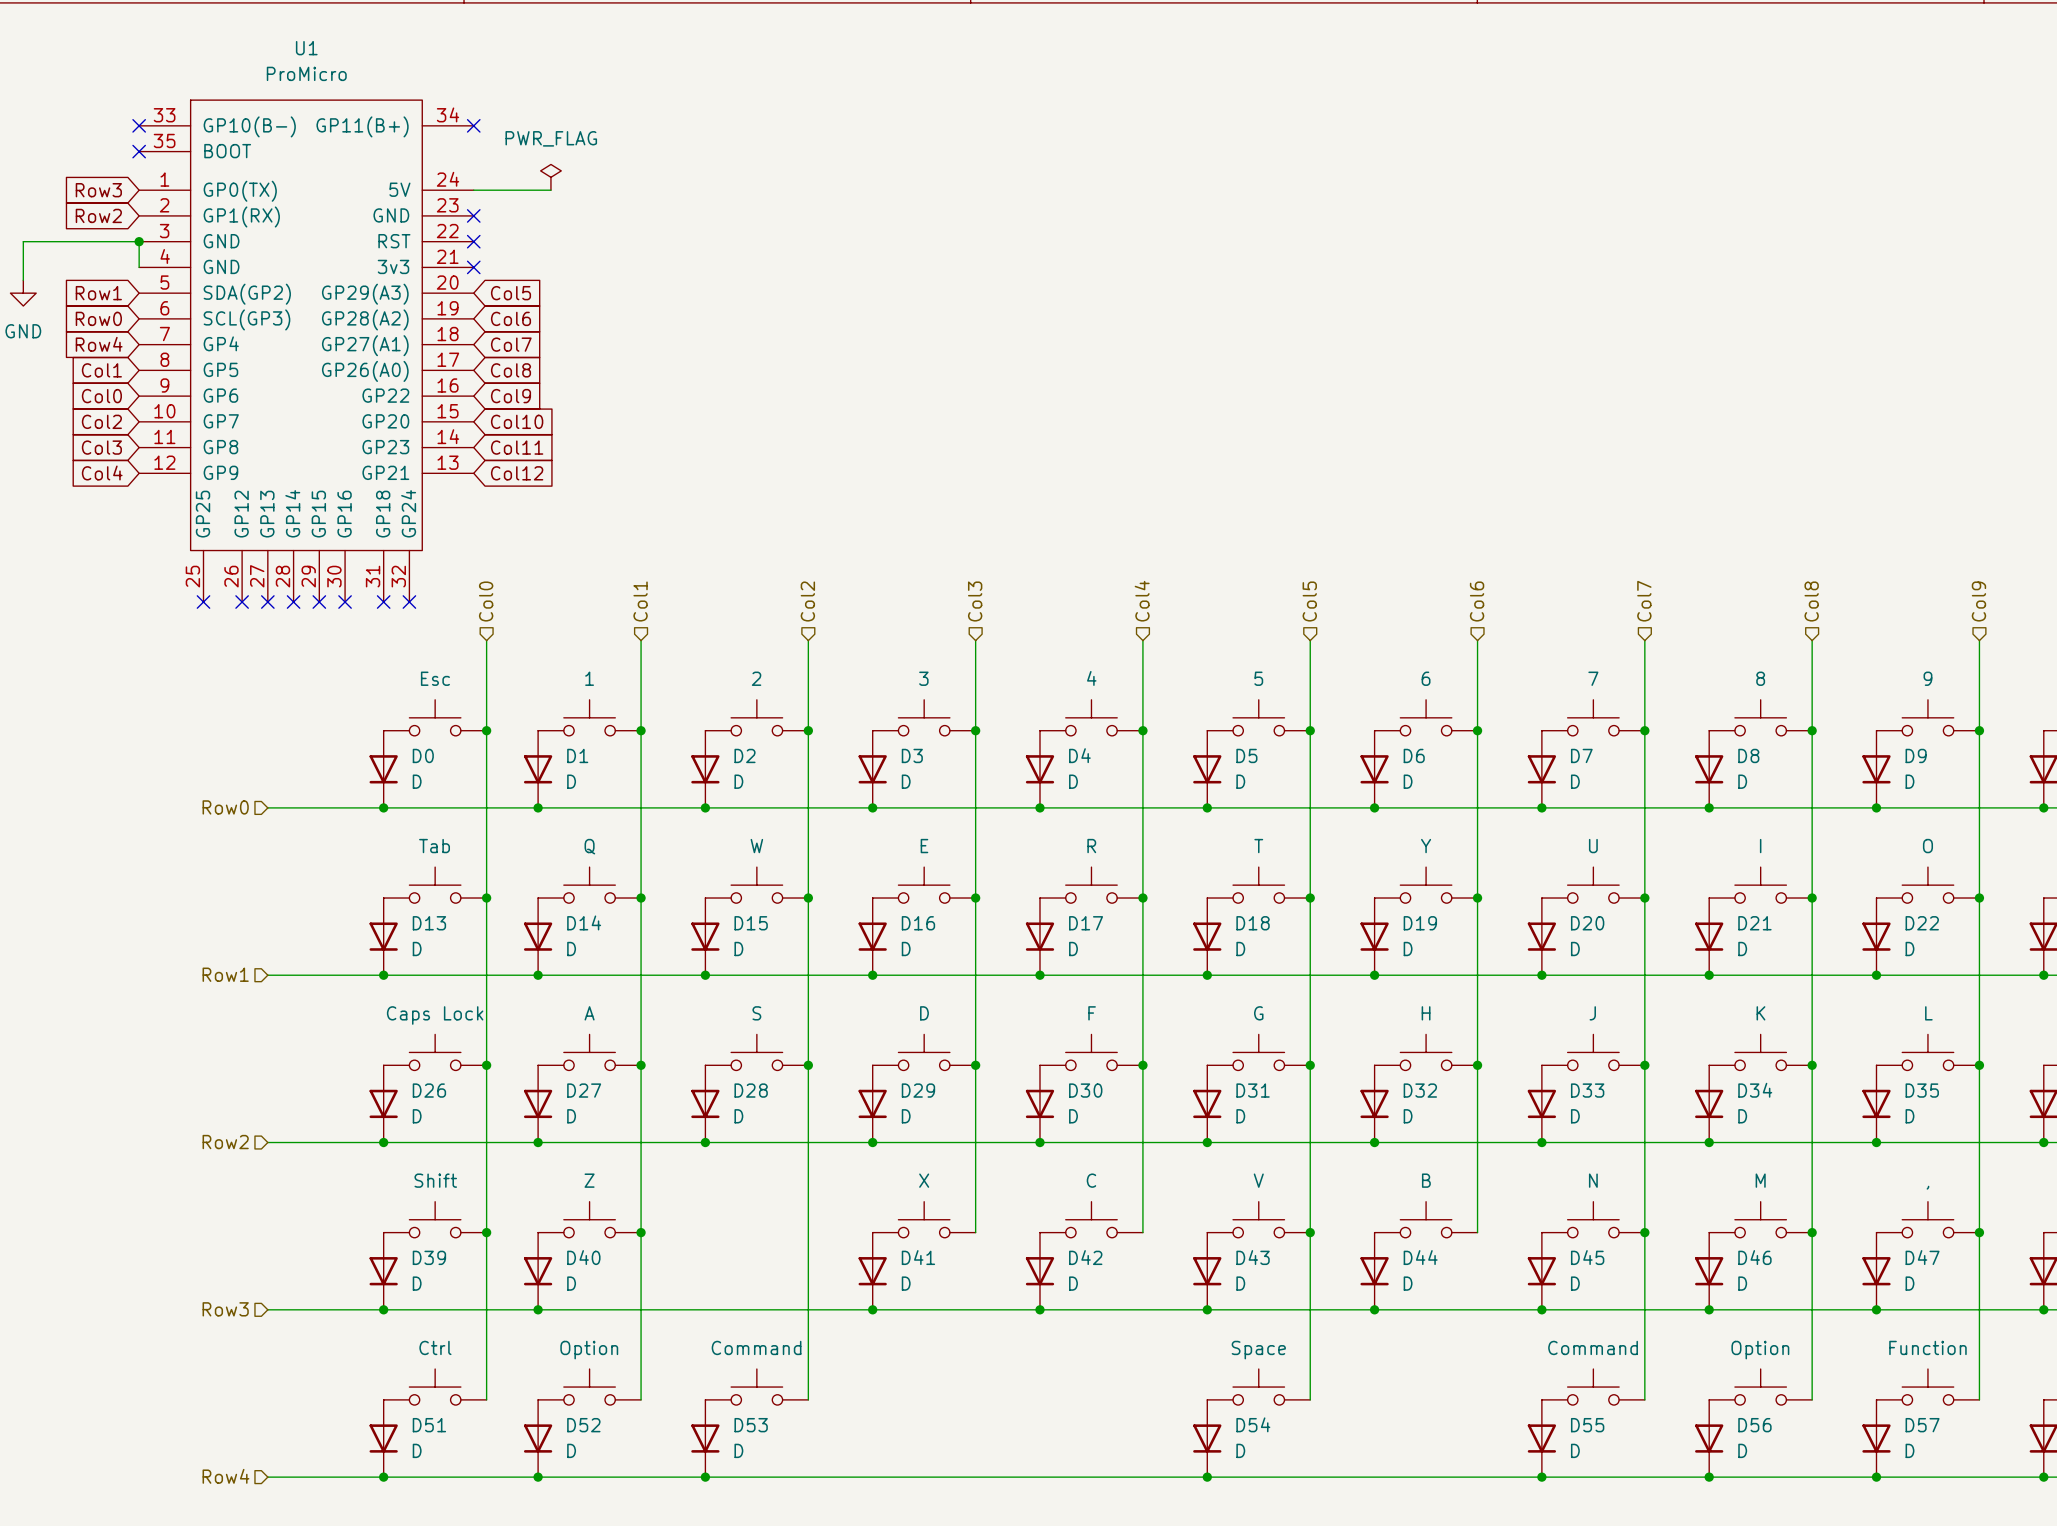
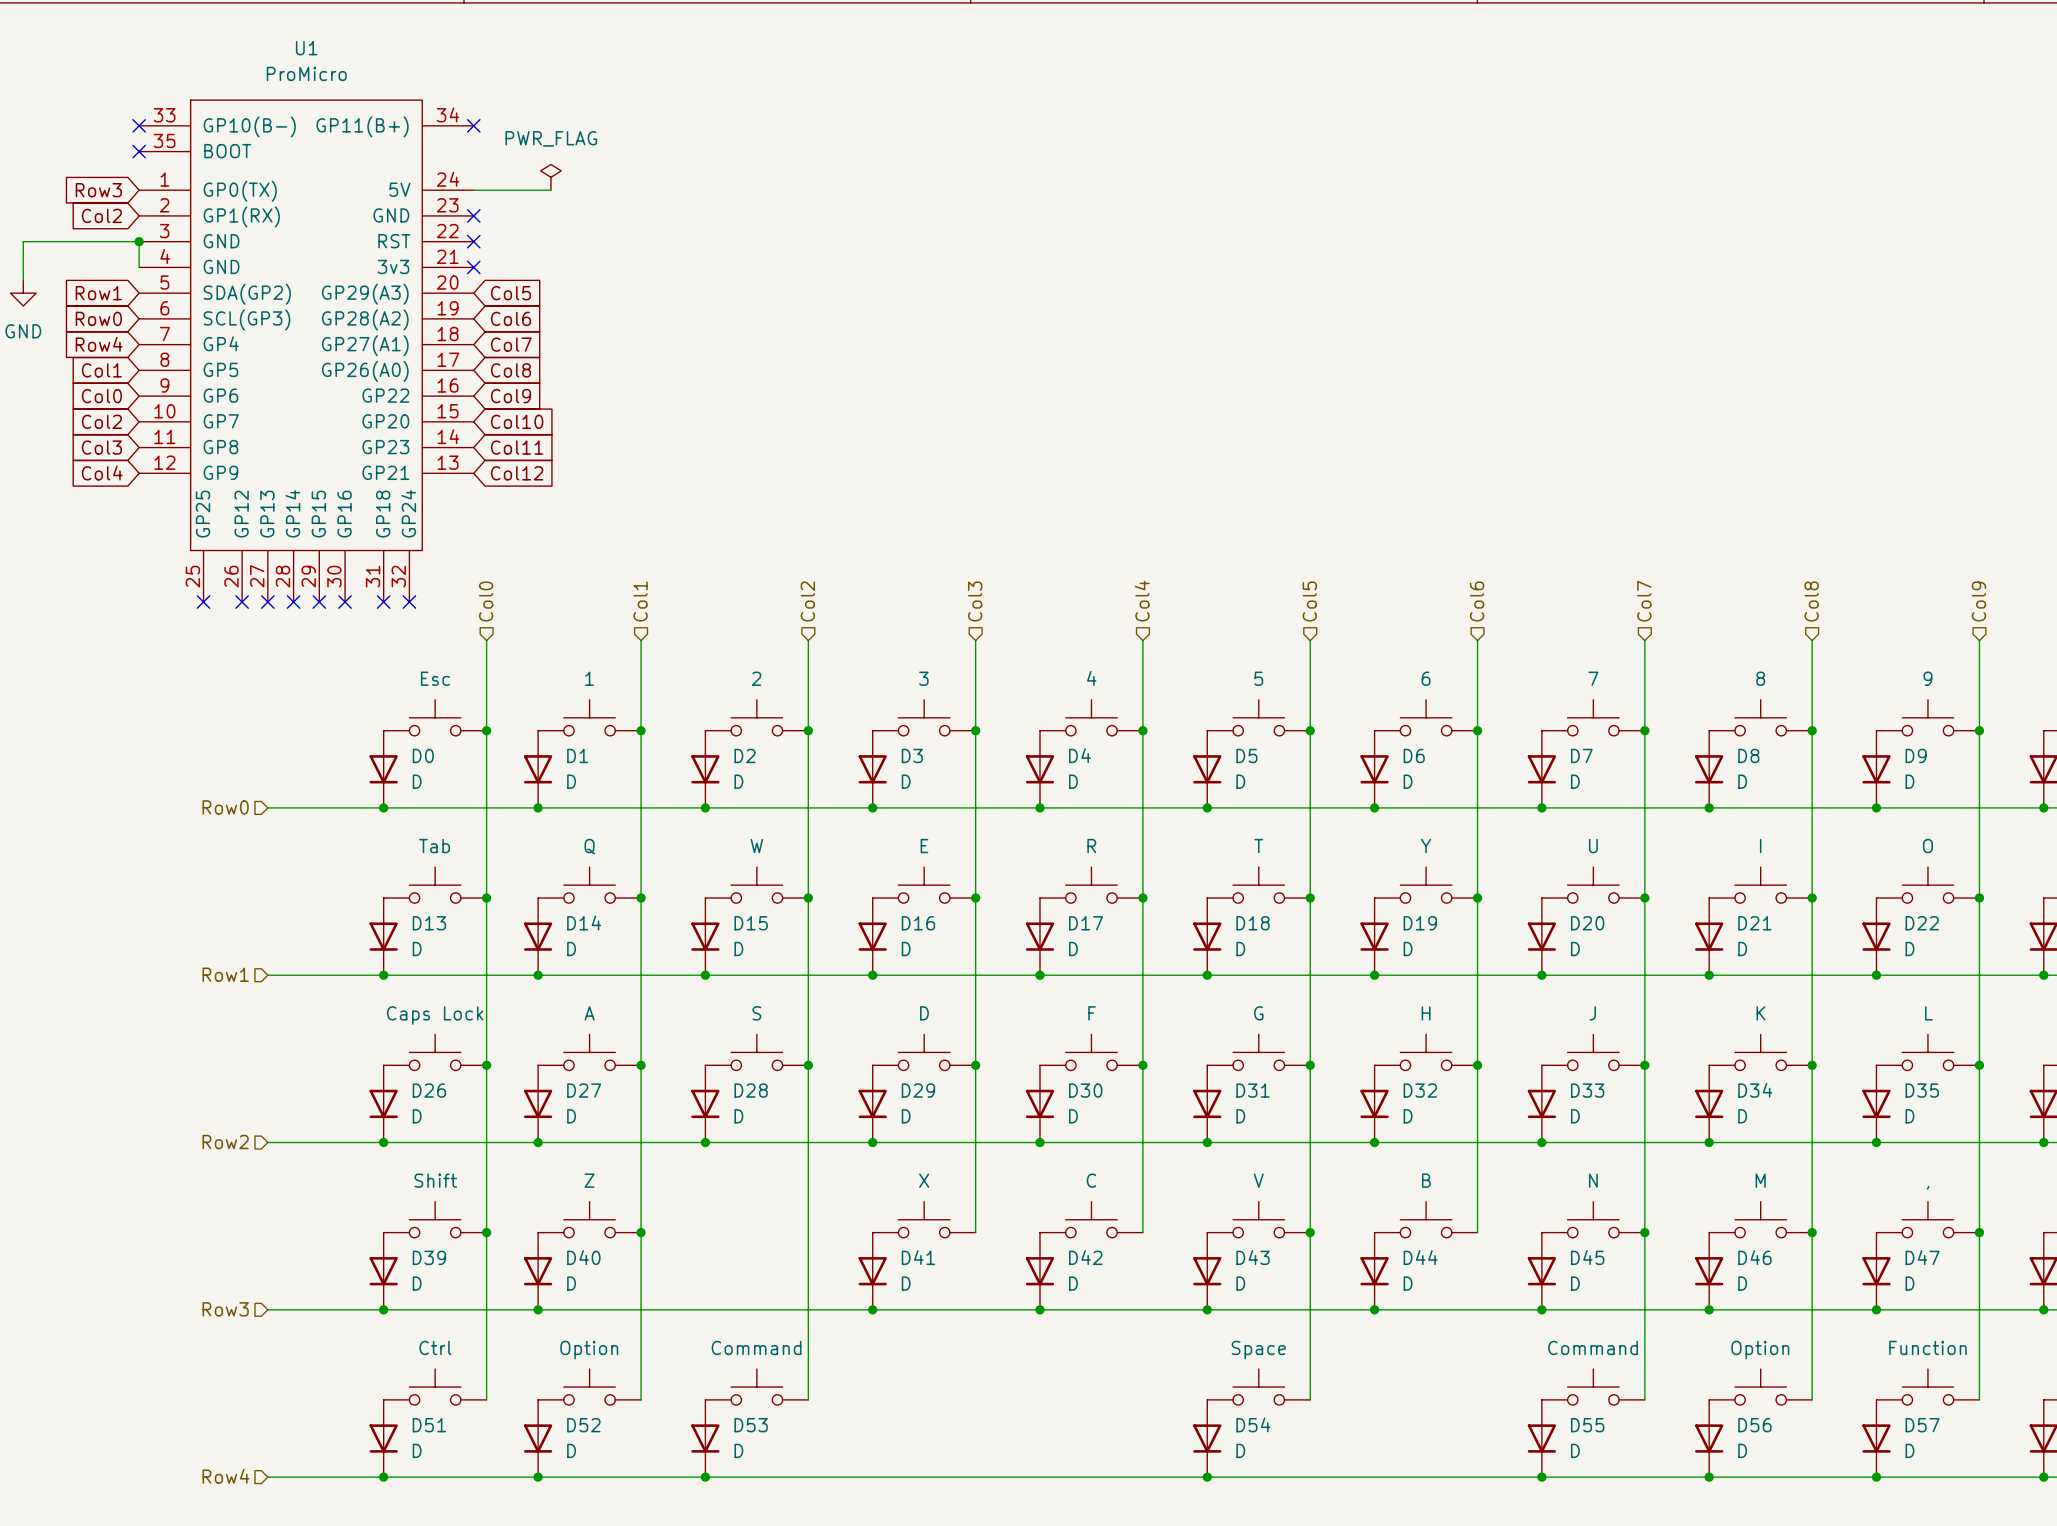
global label: Row2 (98, 215) -> Col2 (101, 215)

